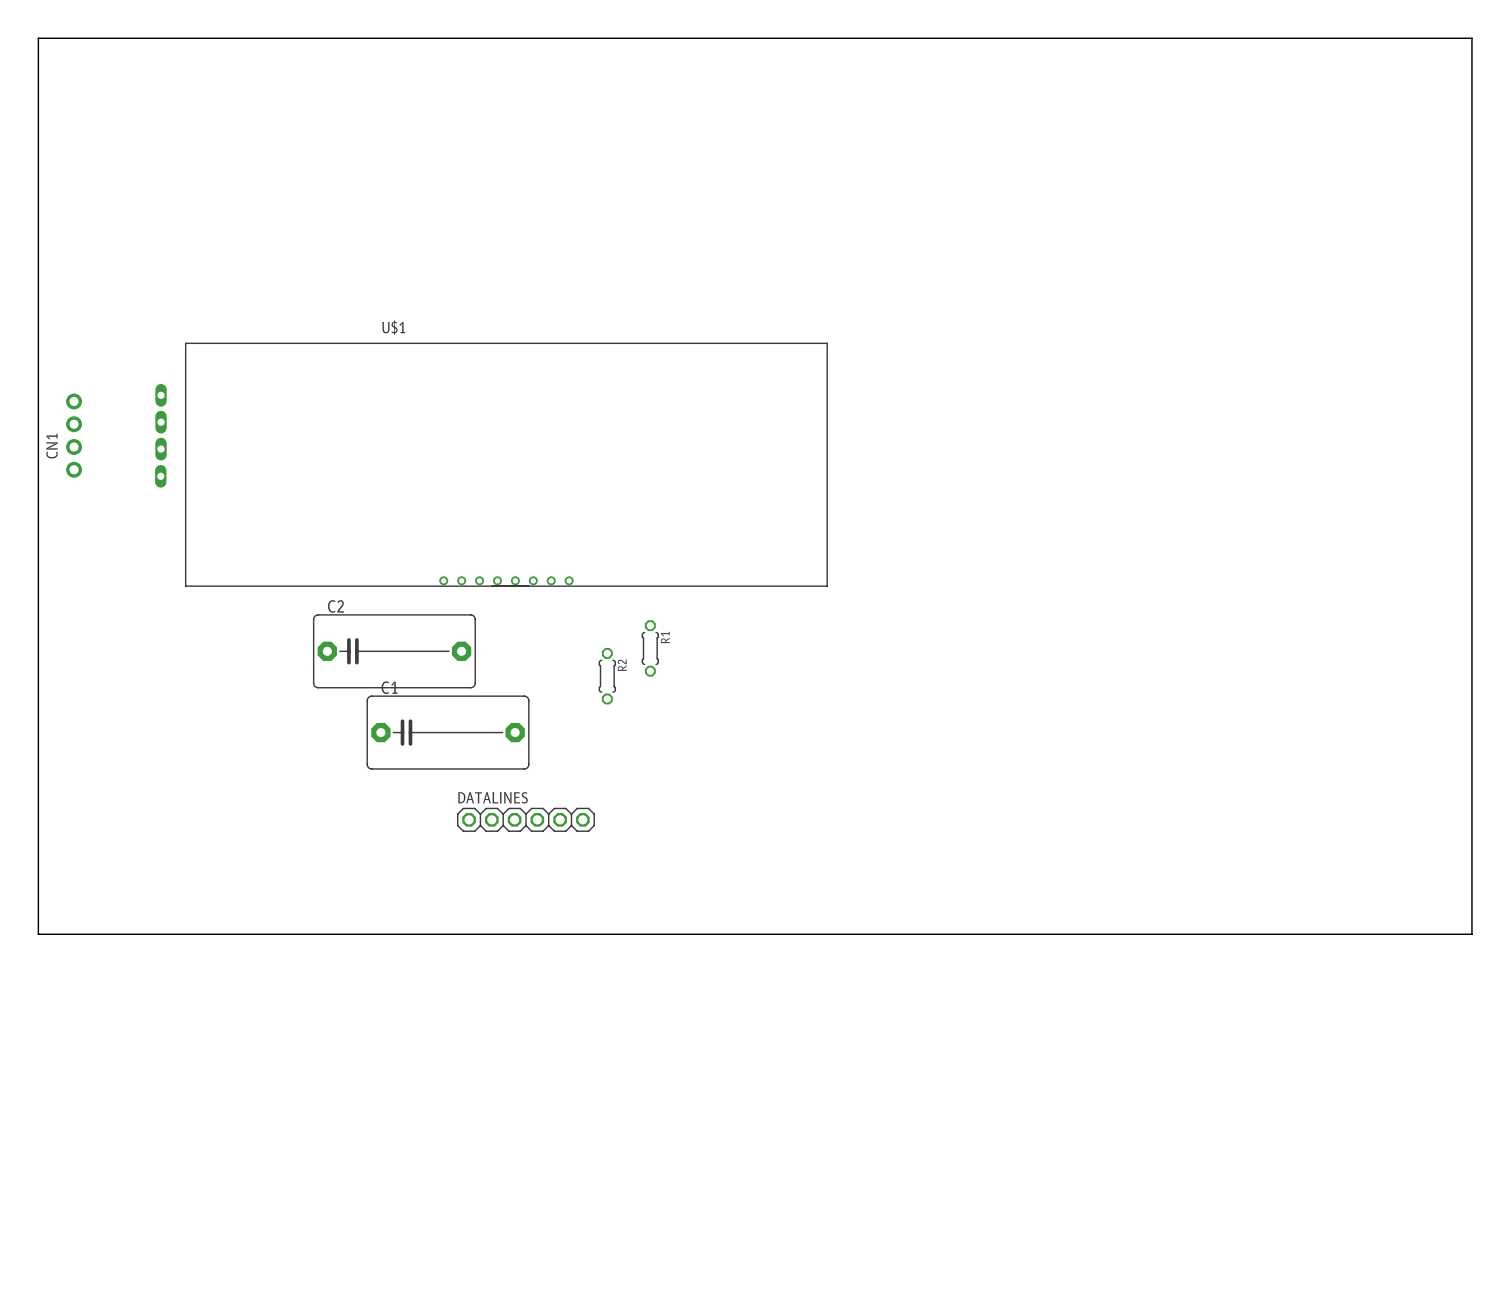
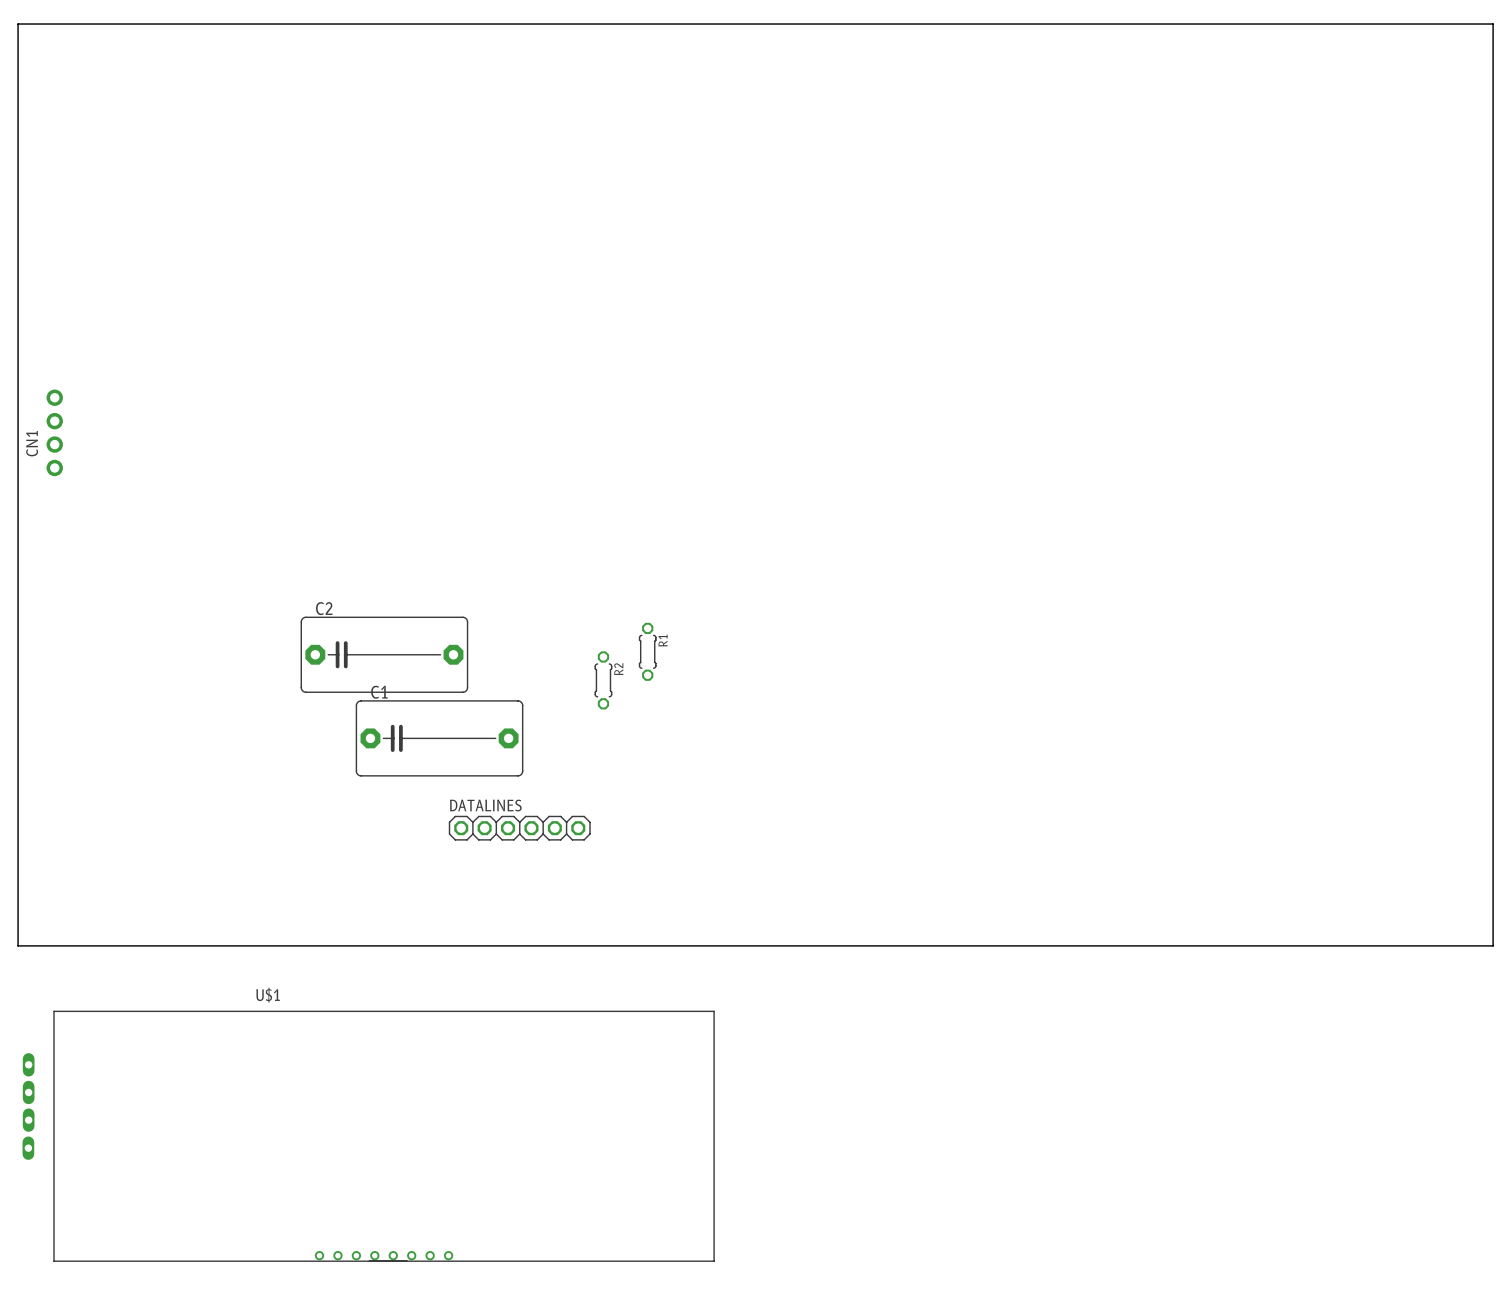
U$1 position: (491, 464) -> (368, 1136)

